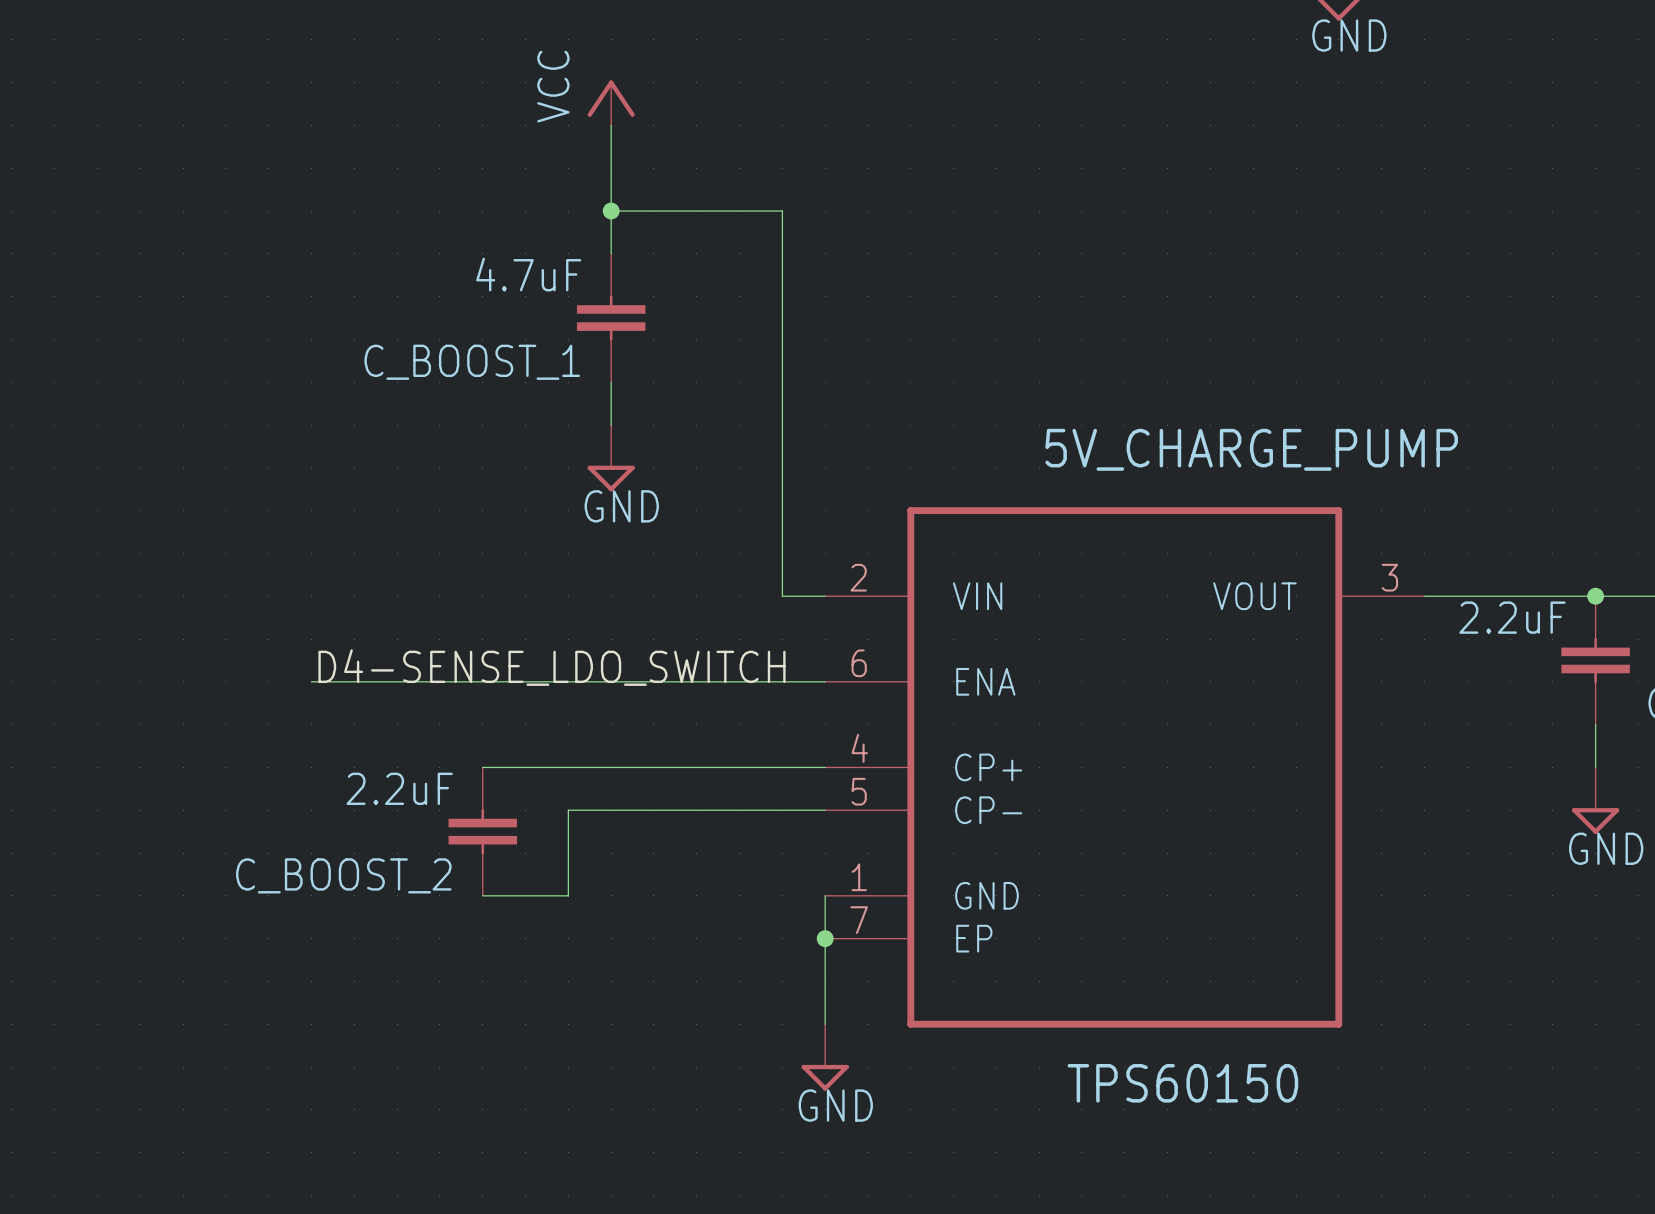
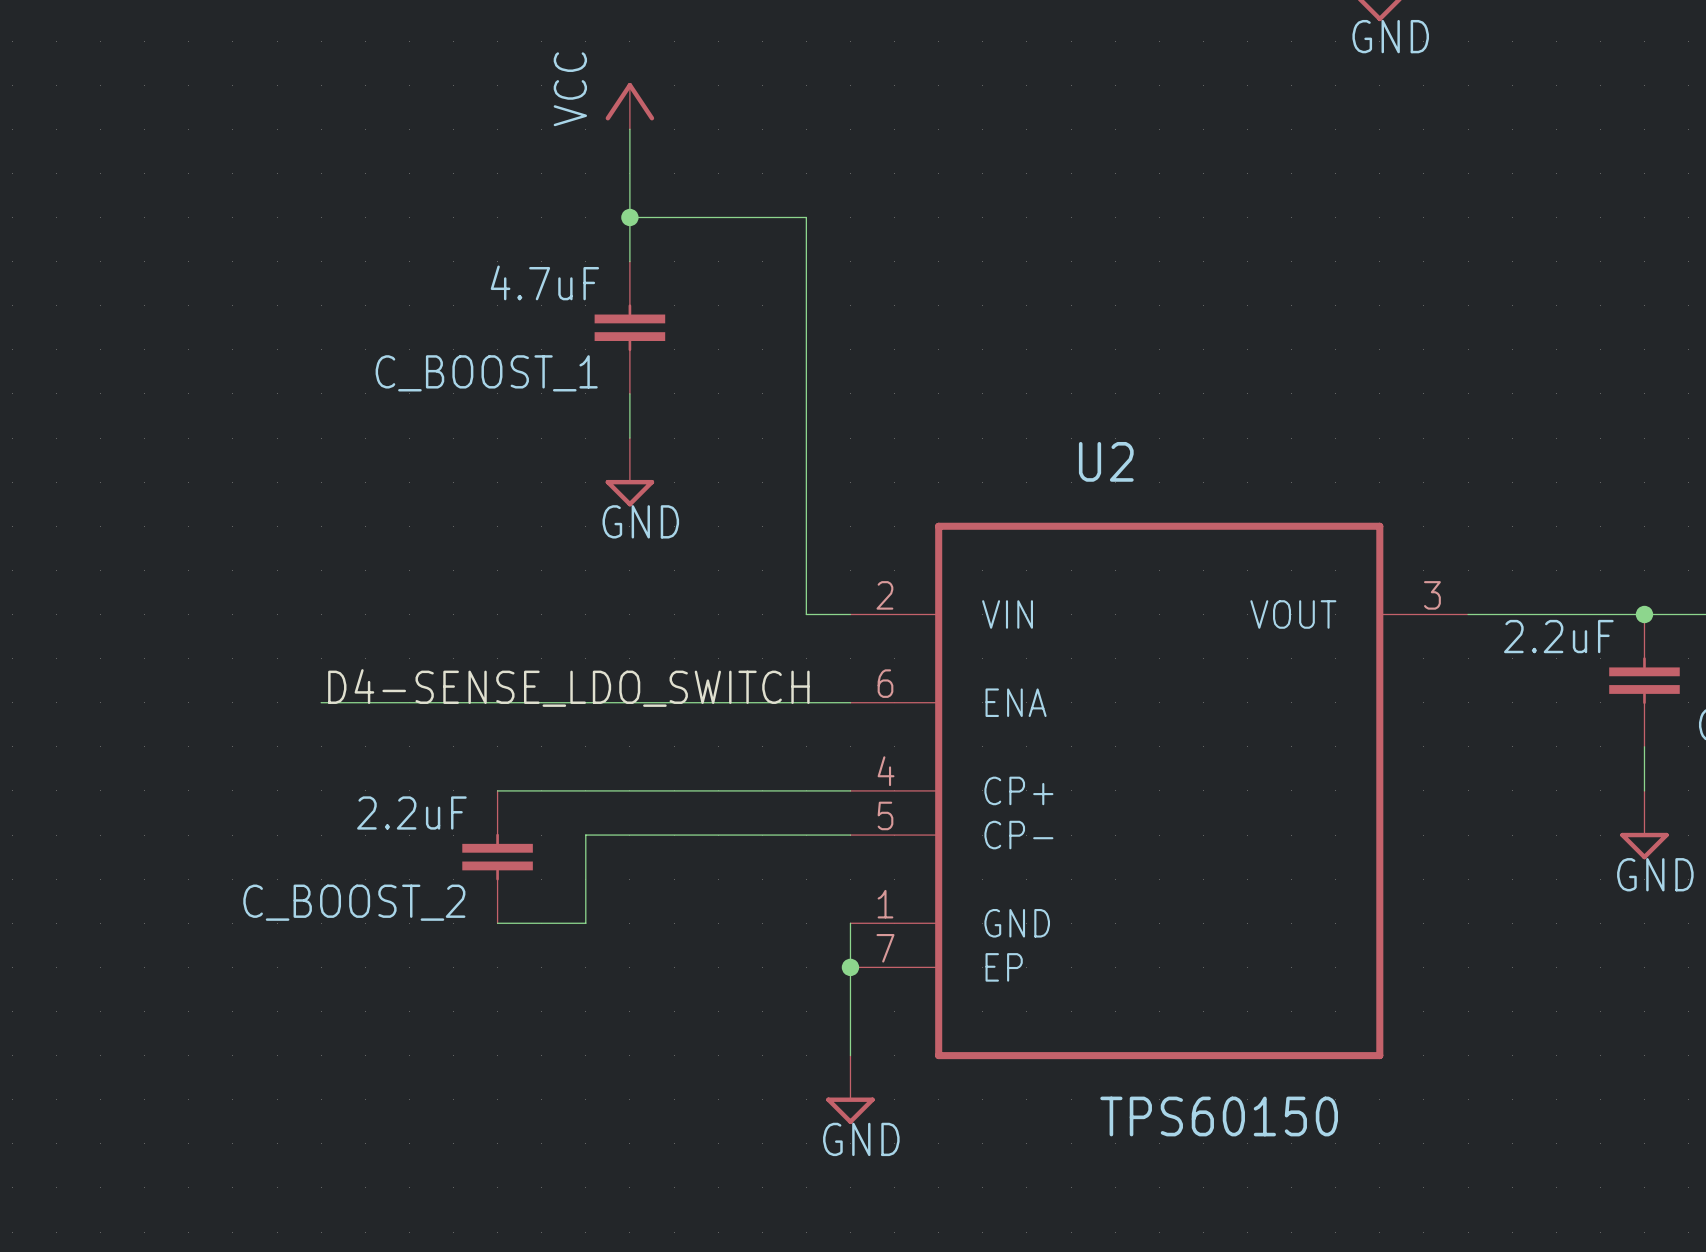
5V_CHARGE_PUMP name: 5V_CHARGE_PUMP (1251, 449) -> U2 (1106, 461)

